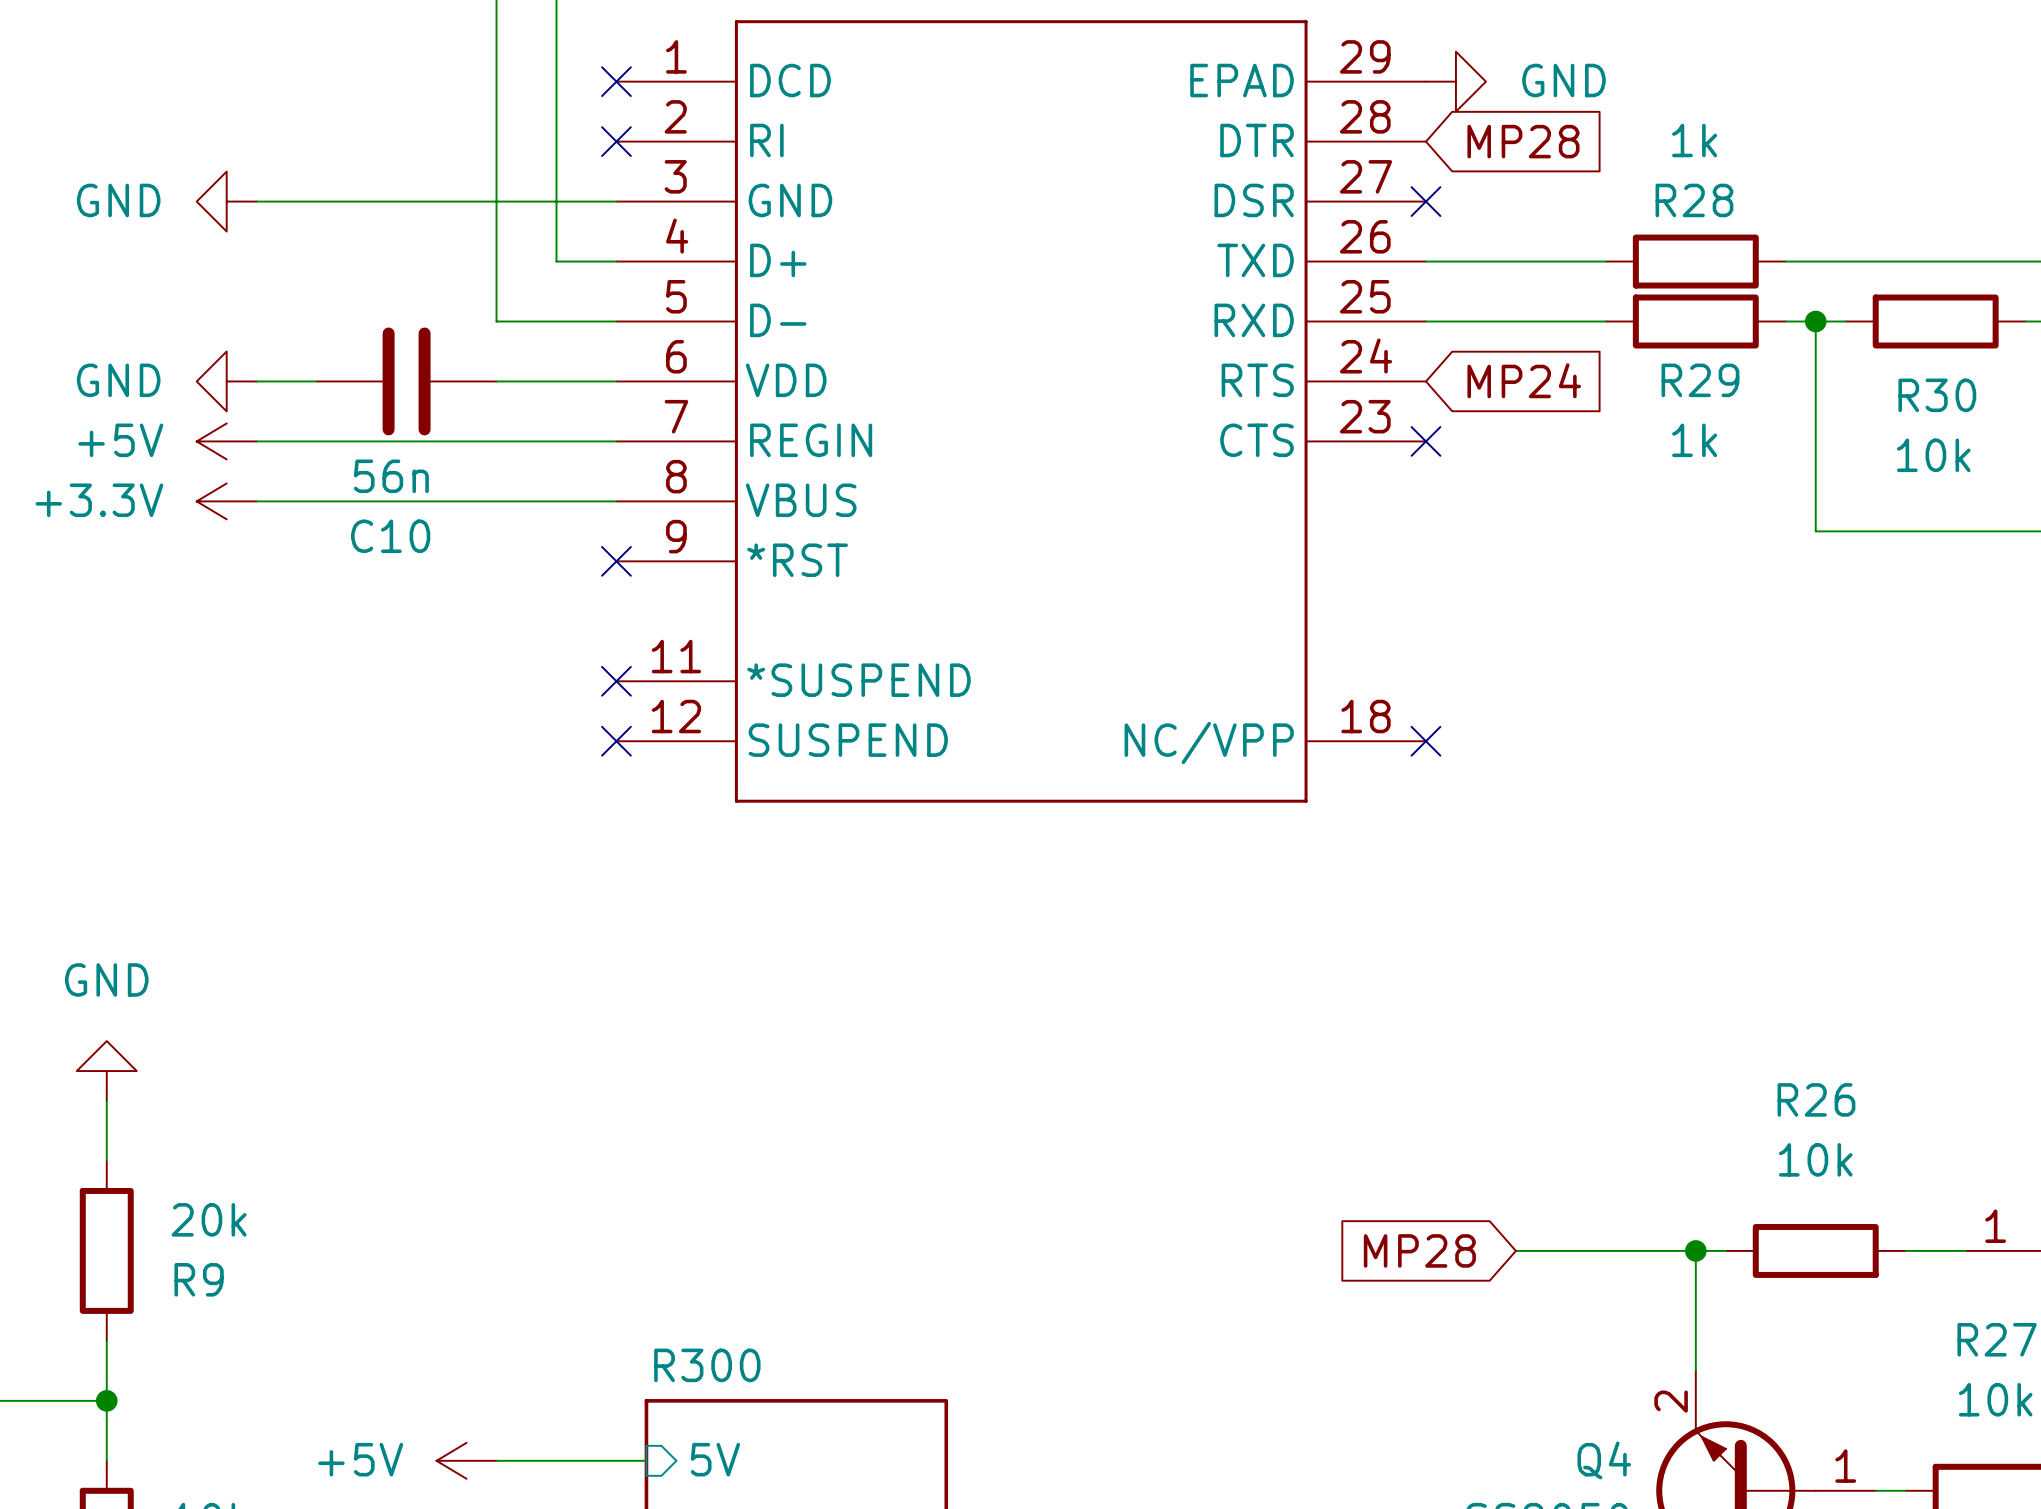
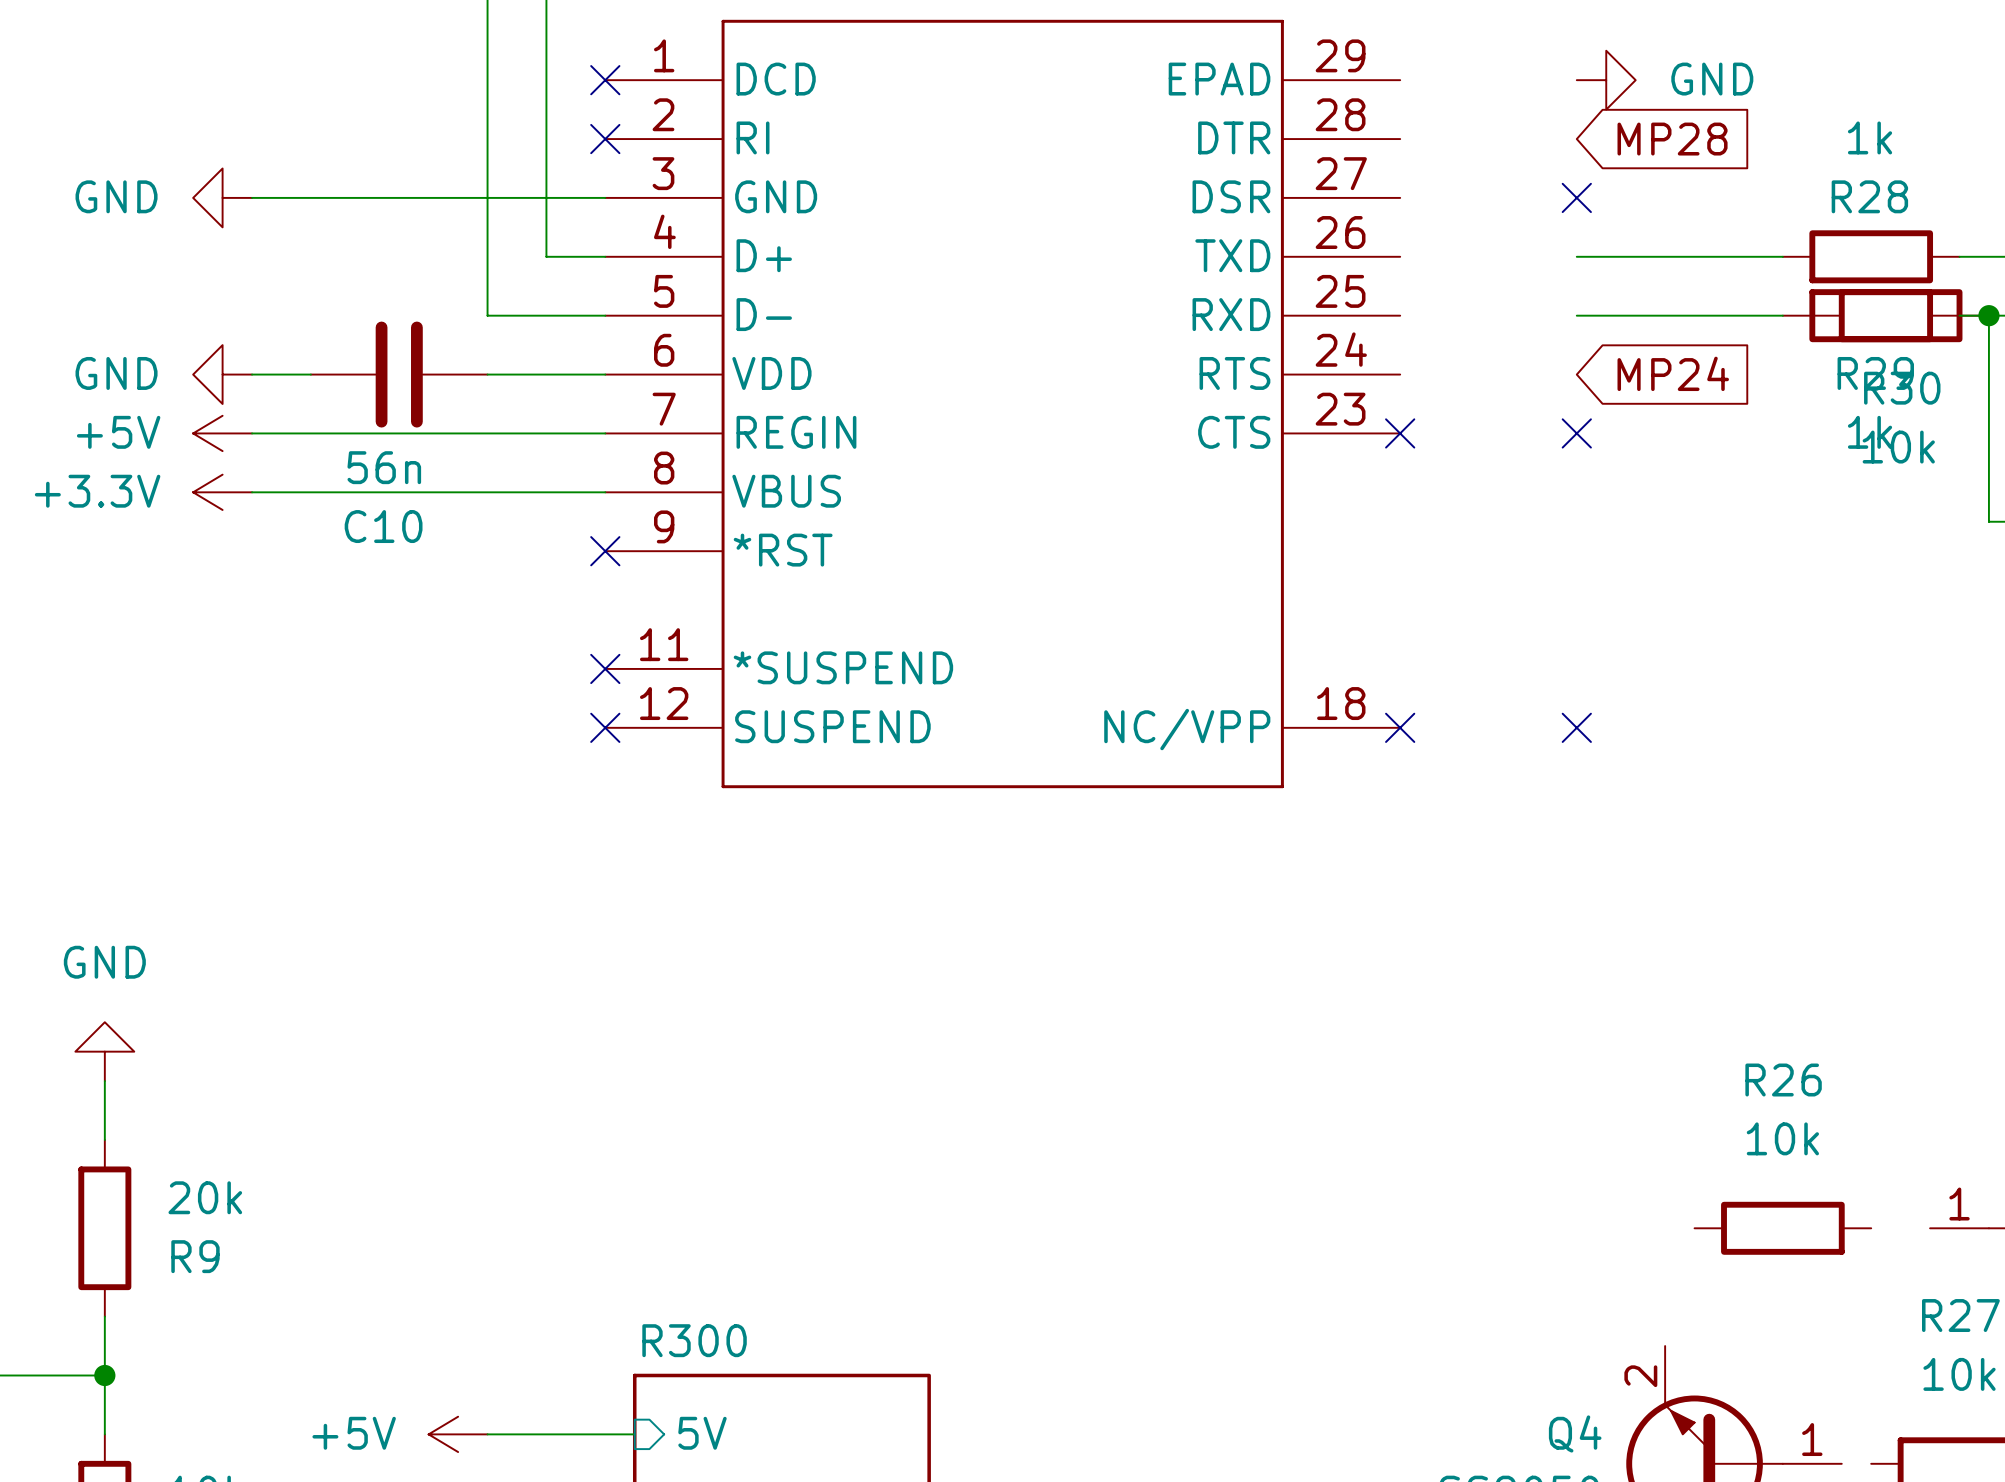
power symbol position: GND (1455, 81) -> GND (1606, 80)
global label position: MP28 (1523, 141) -> MP28 (1672, 139)
no-connect mark: (1425, 201) -> none
no-connect mark: none -> (1576, 197)
wire: (1425, 261) (1605, 261) -> (1753, 256) (1576, 256)
R28 position: (1695, 261) -> (1871, 256)
wire: (1815, 261) (1995, 261) -> none
wire: (1425, 321) (1605, 321) -> (1753, 315) (1576, 315)
R29 position: (1695, 321) -> (1871, 315)
junction: (1815, 321) -> none
wire: (1845, 321) (1815, 321) (1815, 531) (2025, 531) -> (1959, 315) (1988, 315) (1988, 521)
junction: none -> (1988, 315)
global label position: MP24 (1524, 380) -> MP24 (1673, 373)
no-connect mark: none -> (1576, 433)
no-connect mark: none -> (1576, 727)
global label: MP28 (1419, 1250) -> none
wire: (1515, 1250) (1725, 1250) -> none
wire: (1695, 1250) (1695, 1370) -> none
junction: (1695, 1250) -> none
wire: (1905, 1250) (1965, 1250) -> none
wire: (1875, 1490) (1905, 1490) -> none

